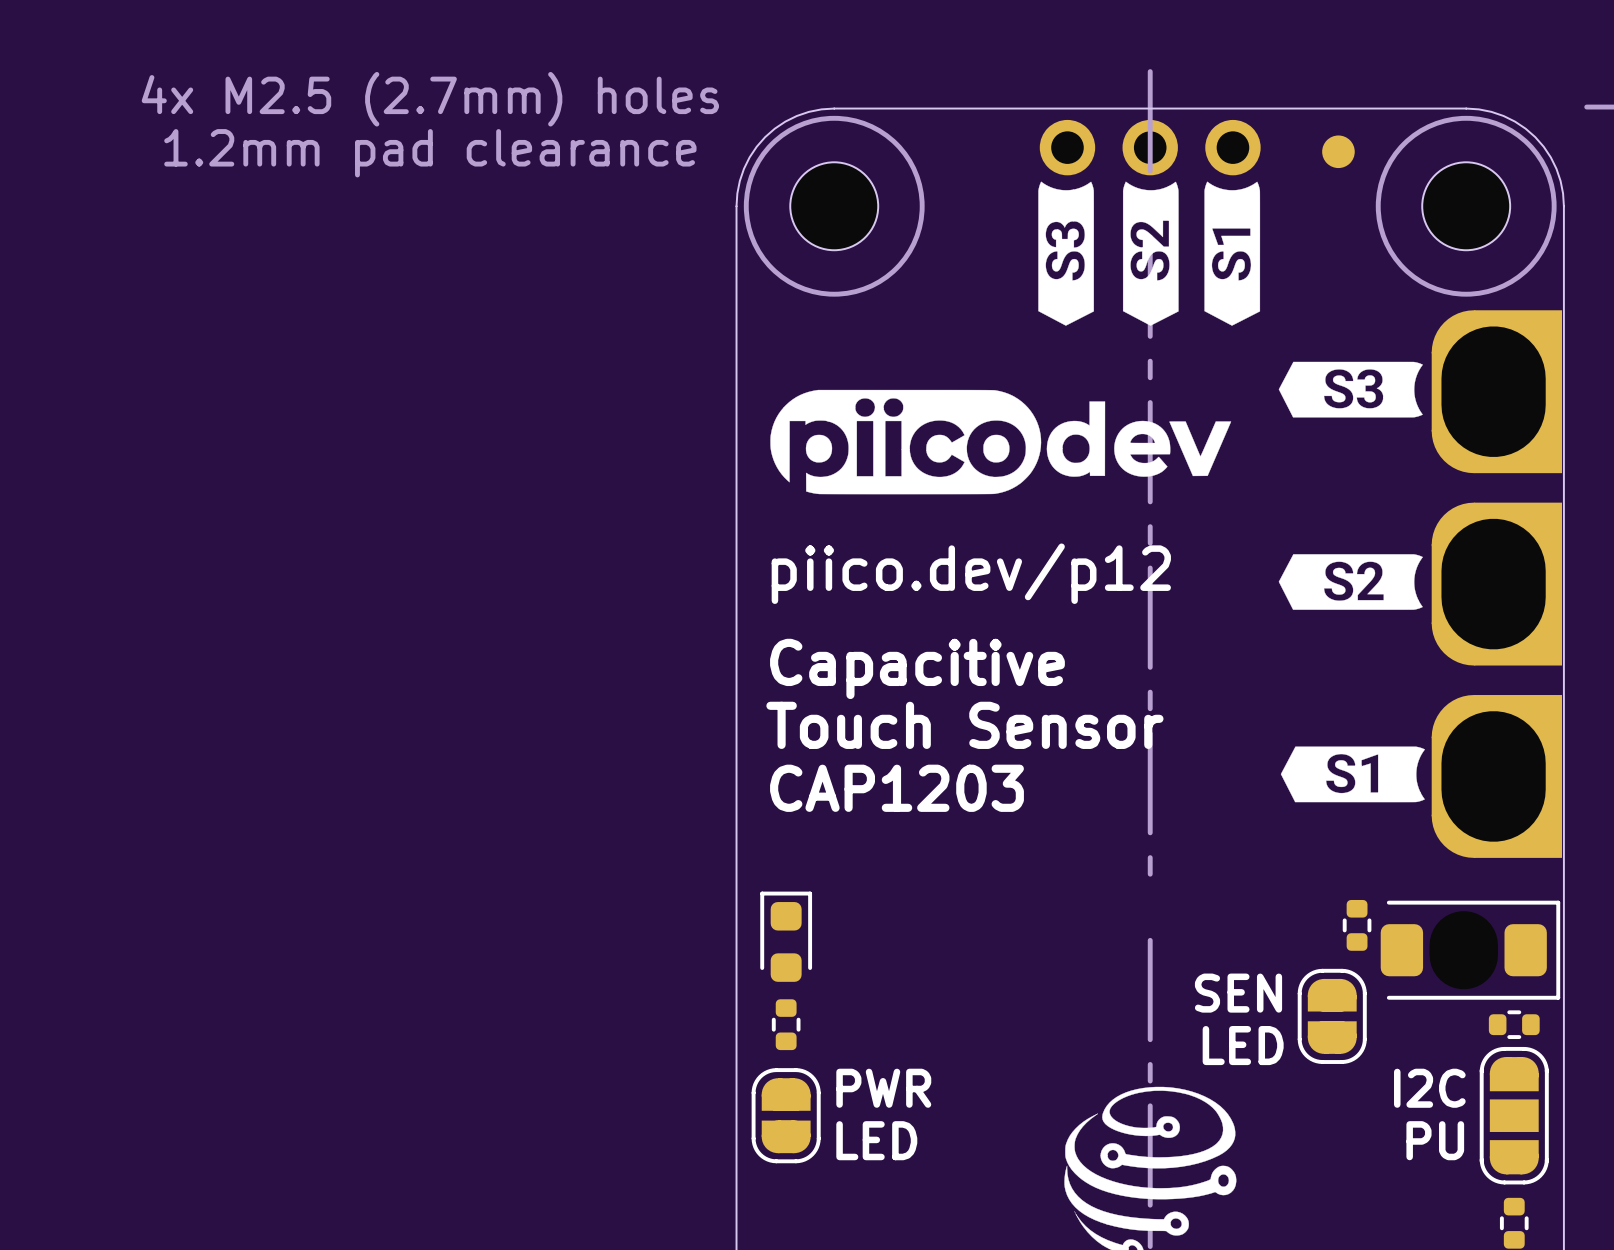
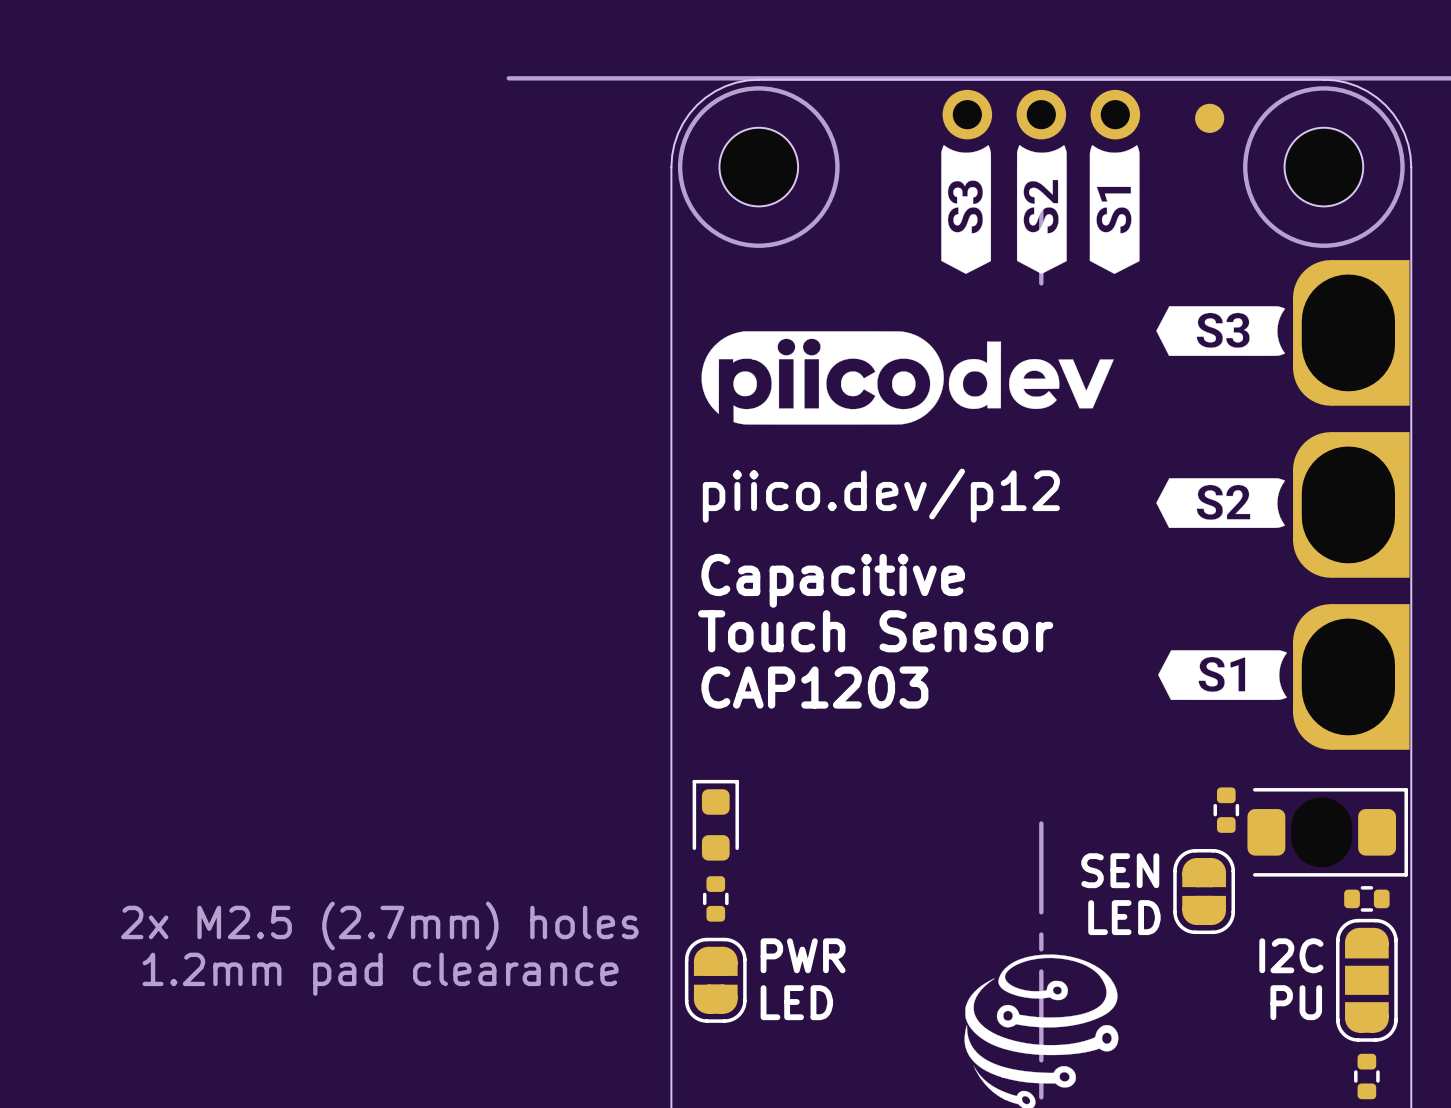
line: (1150, 71) (1150, 170) -> none
text: 4x M2.5 (2.7mm) holes (430, 99) -> none
line: none -> (508, 78) (1431, 78)
text: 1.2mm pad clearance (430, 153) -> none
line: (1150, 361) (1150, 377) -> none
line: (1150, 402) (1150, 501) -> none
line: (1150, 526) (1150, 543) -> none
line: (1150, 568) (1150, 667) -> none
line: (1150, 692) (1150, 708) -> none
line: (1150, 733) (1150, 832) -> none
line: (1150, 857) (1150, 874) -> none
text: none -> 2x M2.5 (2.7mm) holes (379, 925)
text: none -> 1.2mm pad clearance (380, 974)

